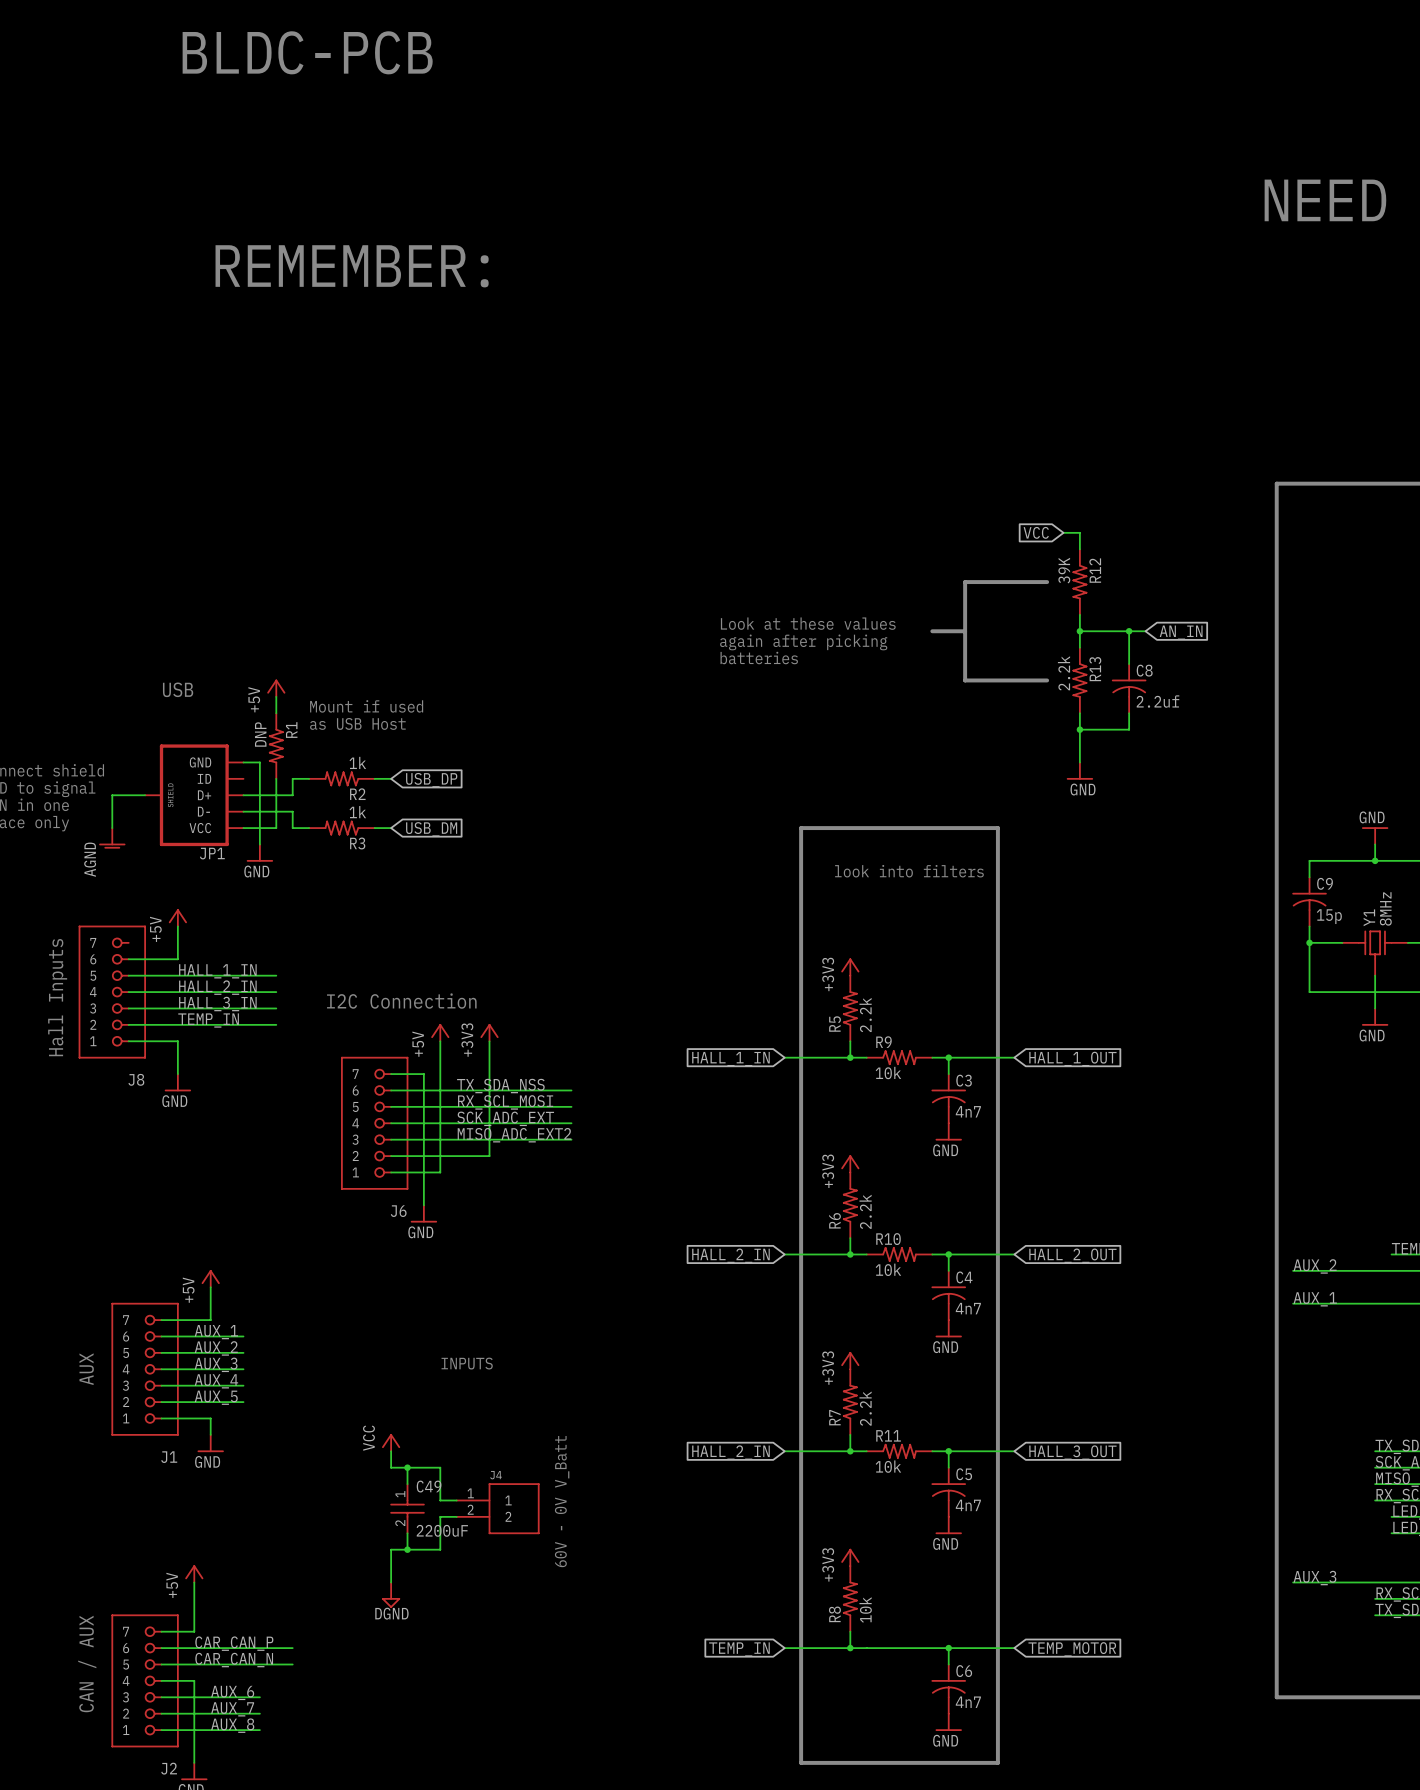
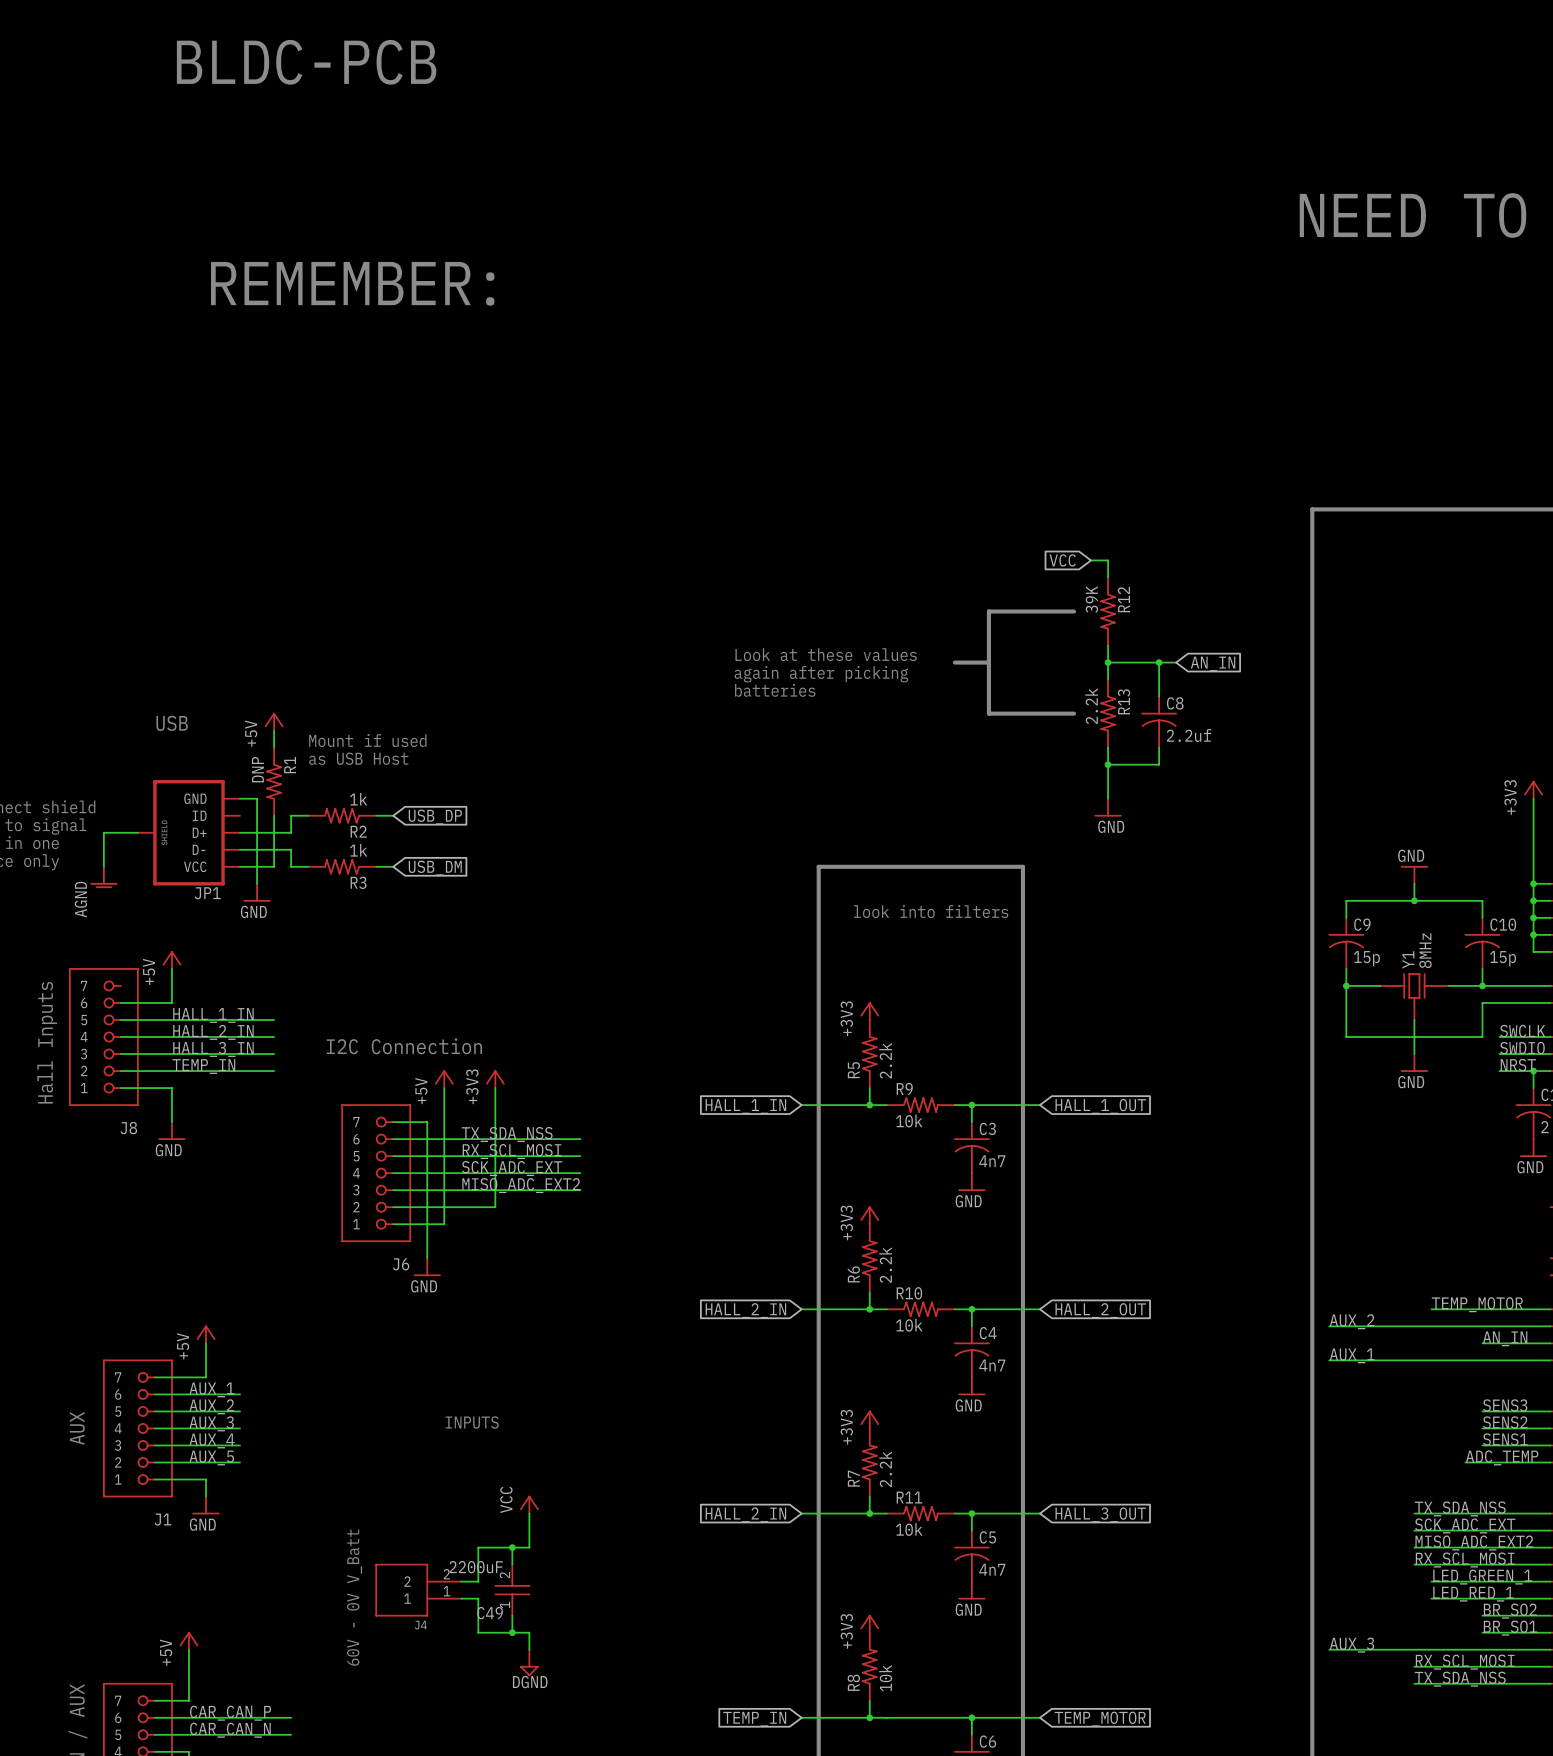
power symbol position: VCC (391, 1442) -> VCC (529, 1504)
wire: (391, 1451) (391, 1467) (440, 1467) (440, 1500) (456, 1500) -> none
wire: (407, 1467) (407, 1484) -> (512, 1547) (512, 1564)
junction: (407, 1467) -> none
junction: none -> (512, 1547)
text: 60V - 0V V_Batt (562, 1501) -> none
C49 rotation: 0° (407, 1508) -> 180° (512, 1590)
C49 position: (407, 1508) -> (512, 1590)
J4 position: (498, 1508) -> (418, 1590)
J4 rotation: 0° (514, 1508) -> 180° (401, 1590)
wire: (456, 1516) (440, 1516) (440, 1549) (391, 1549) (391, 1582) -> (461, 1581) (478, 1581) (478, 1547) (529, 1547) (529, 1513)
text: none -> 60V - 0V V_Batt (354, 1597)
wire: (407, 1533) (407, 1549) -> (512, 1615) (512, 1632)
wire: none -> (461, 1598) (478, 1598) (478, 1632) (529, 1632) (529, 1649)
junction: (407, 1549) -> none
junction: none -> (512, 1632)
power symbol position: DGND (391, 1595) -> DGND (529, 1662)

